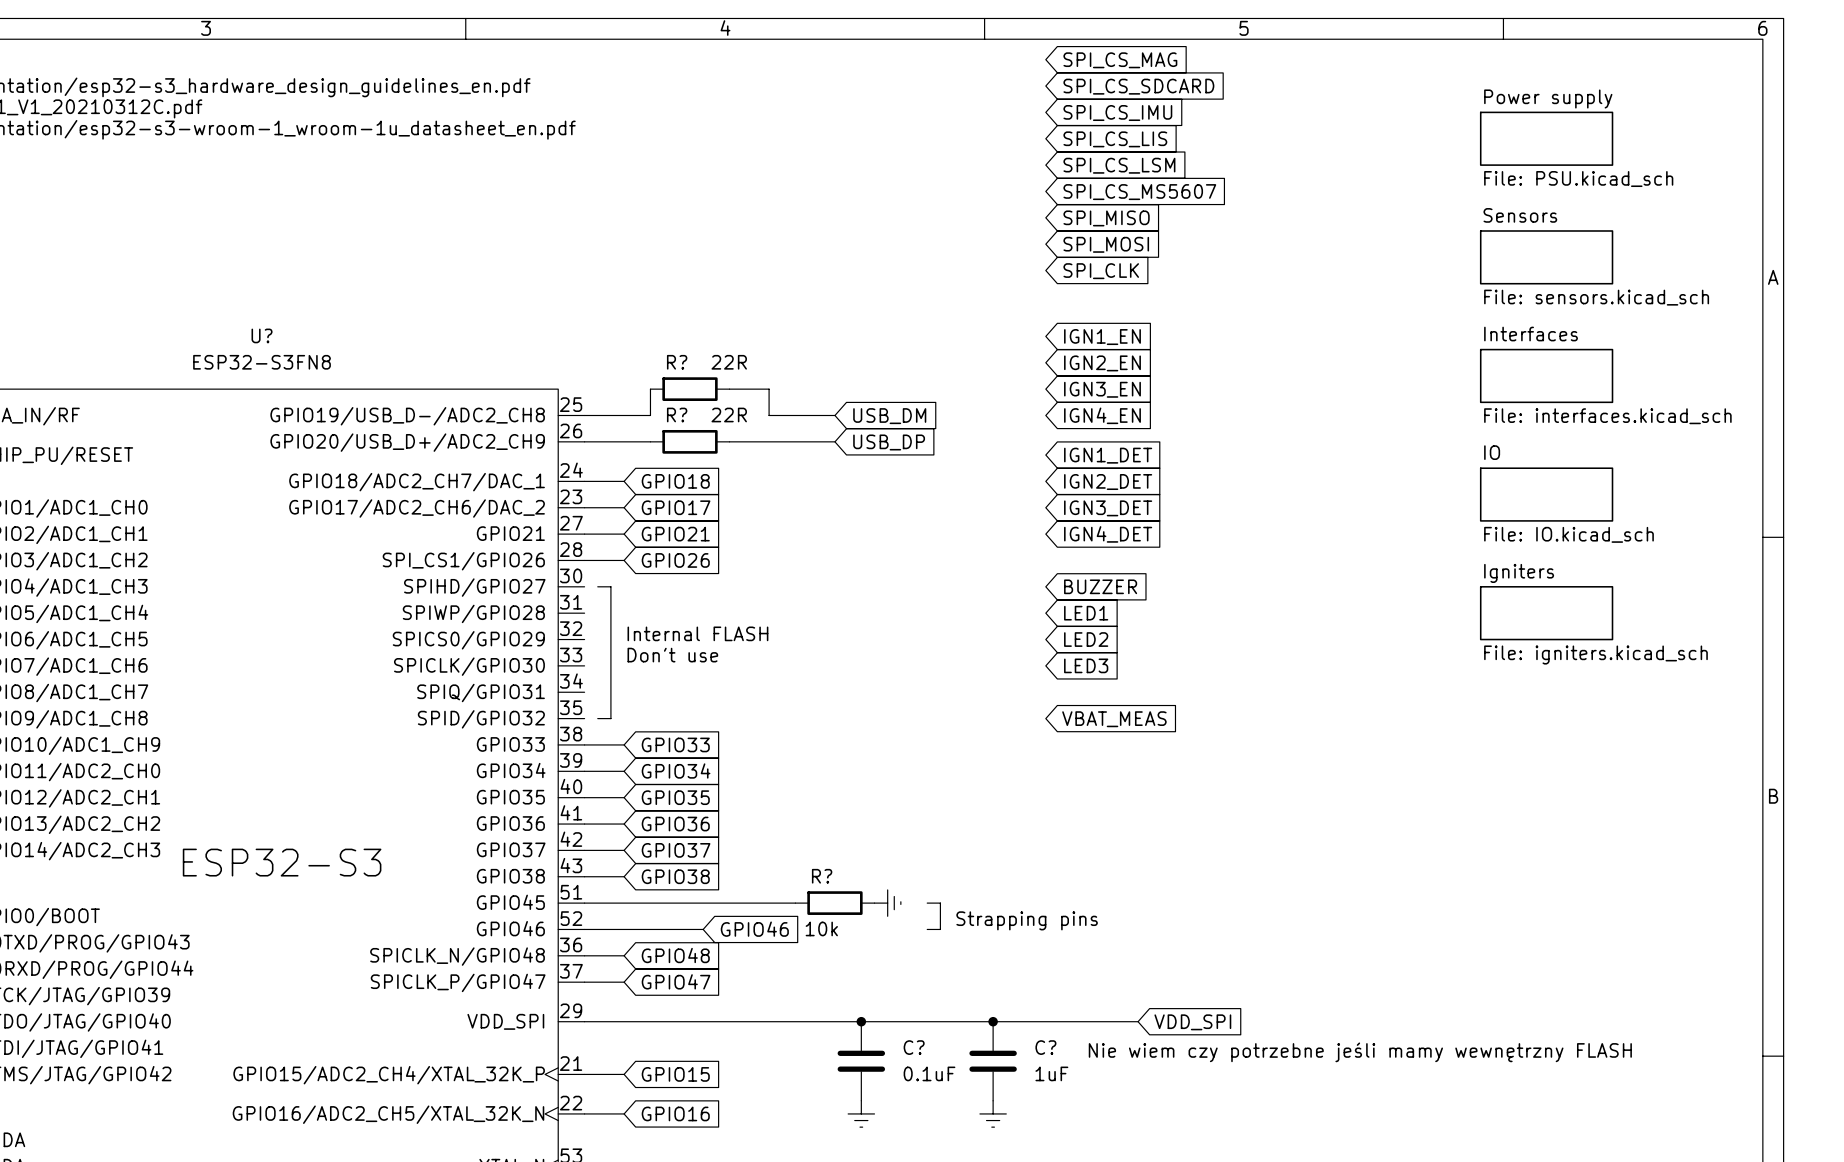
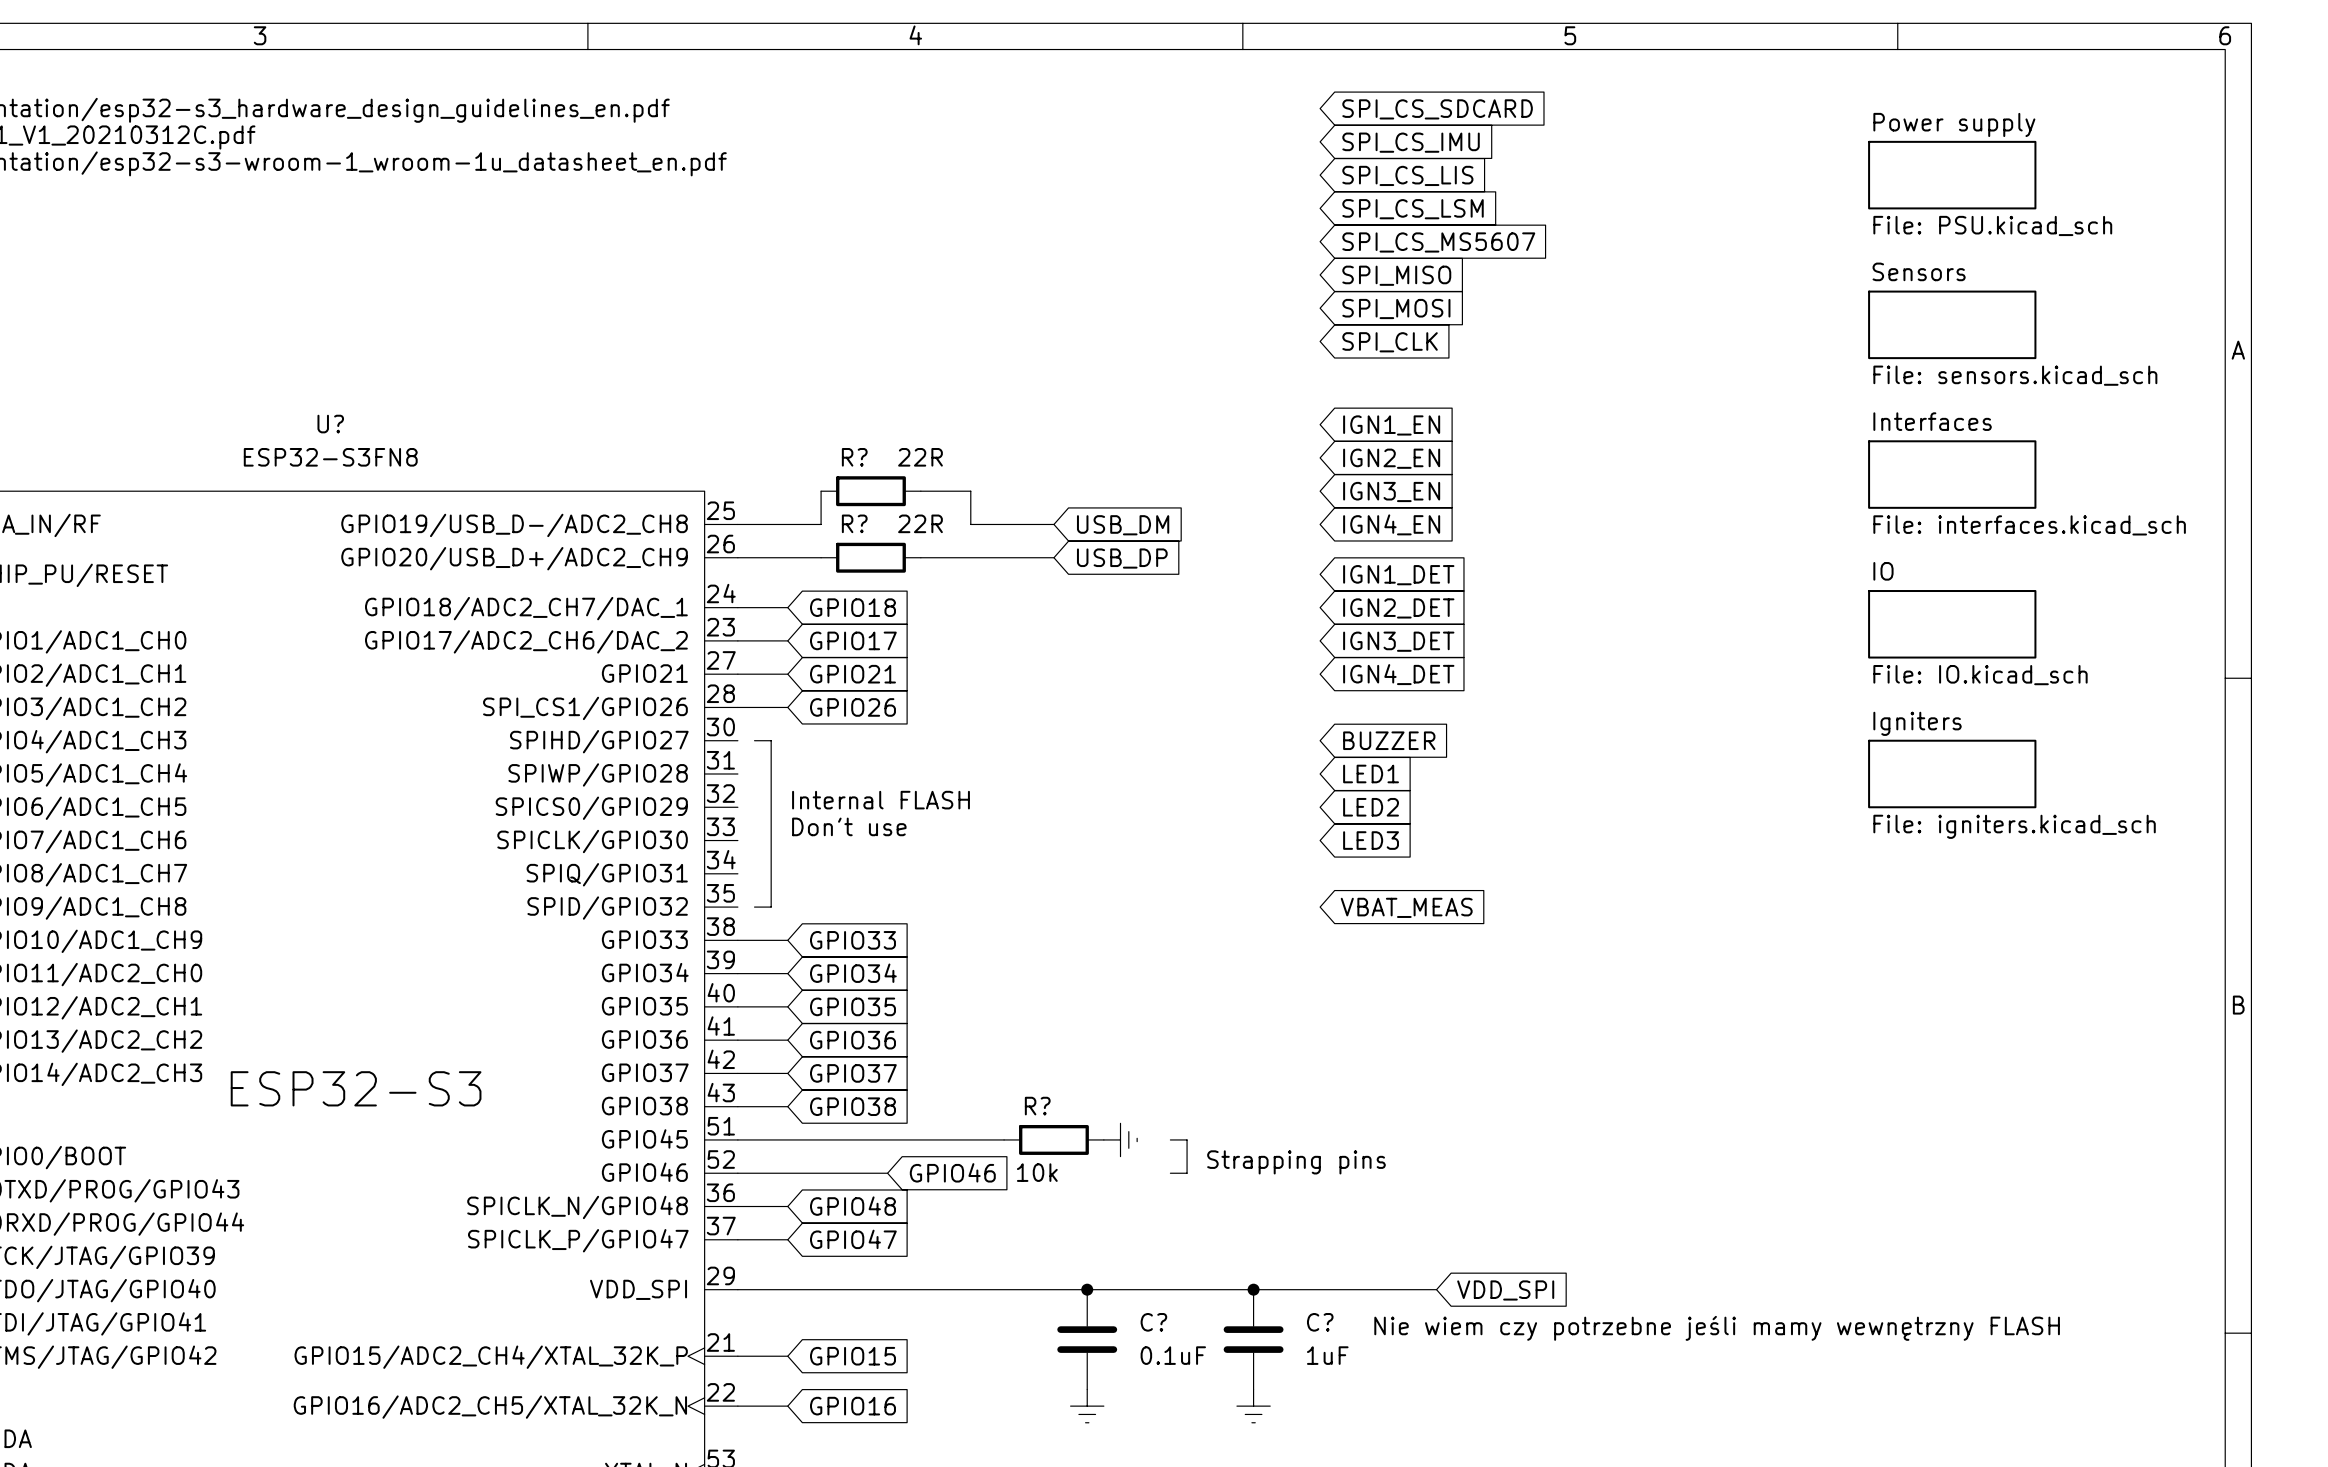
global label: SPI_CS_MAG (1120, 60) -> none

